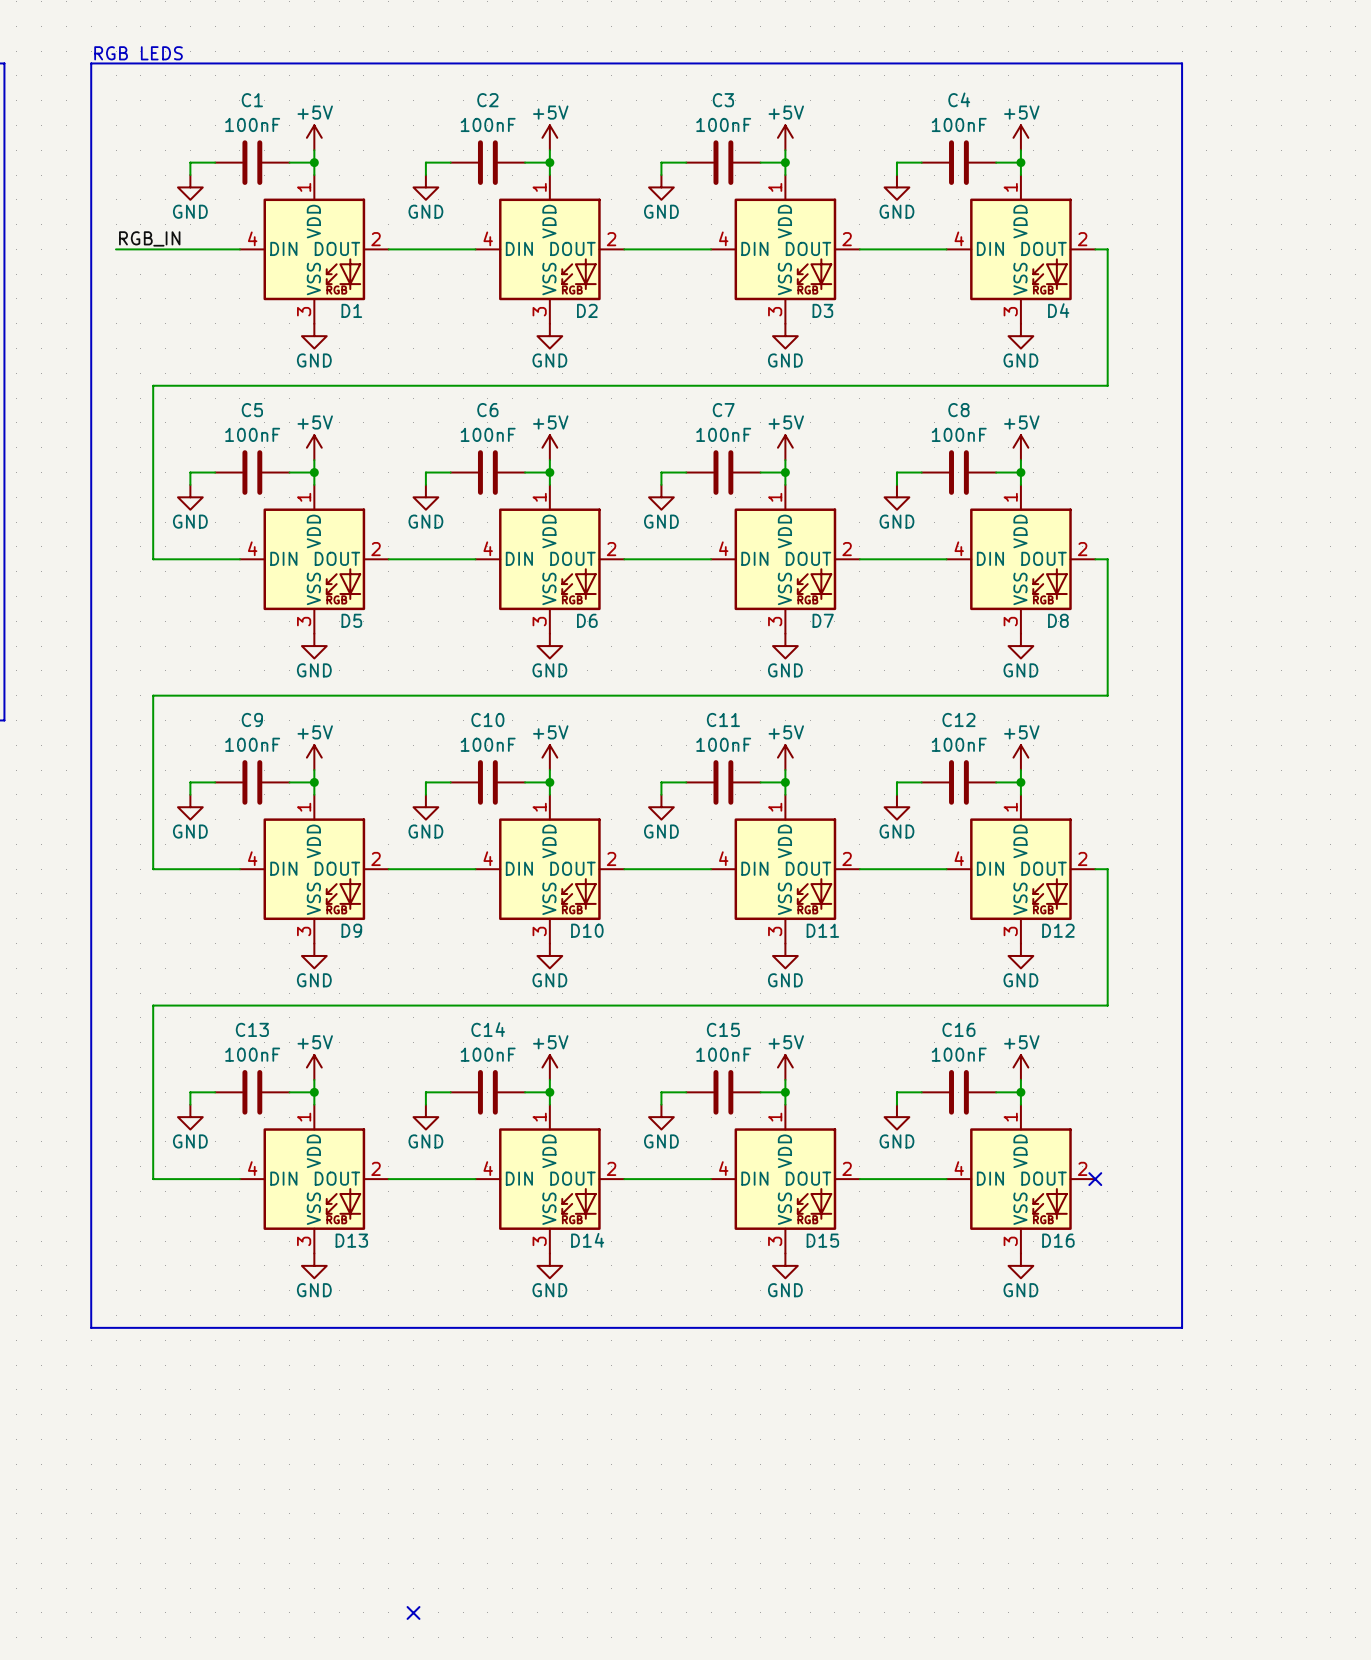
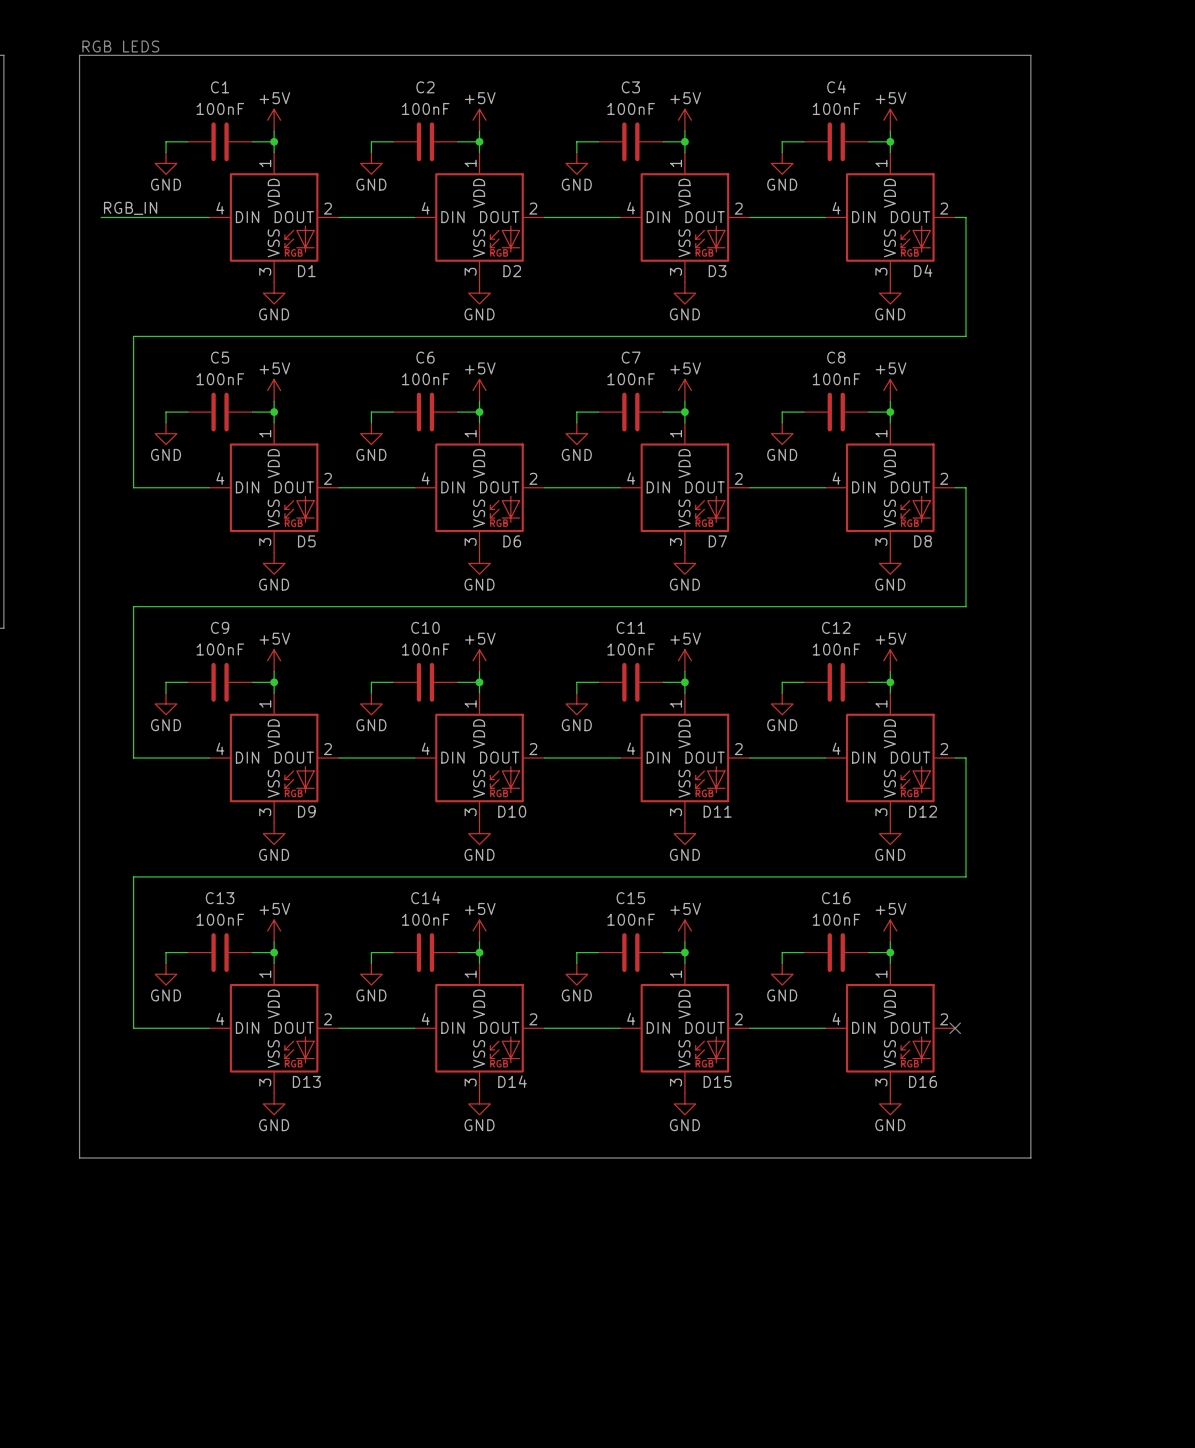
no-connect mark: (413, 1612) -> none

